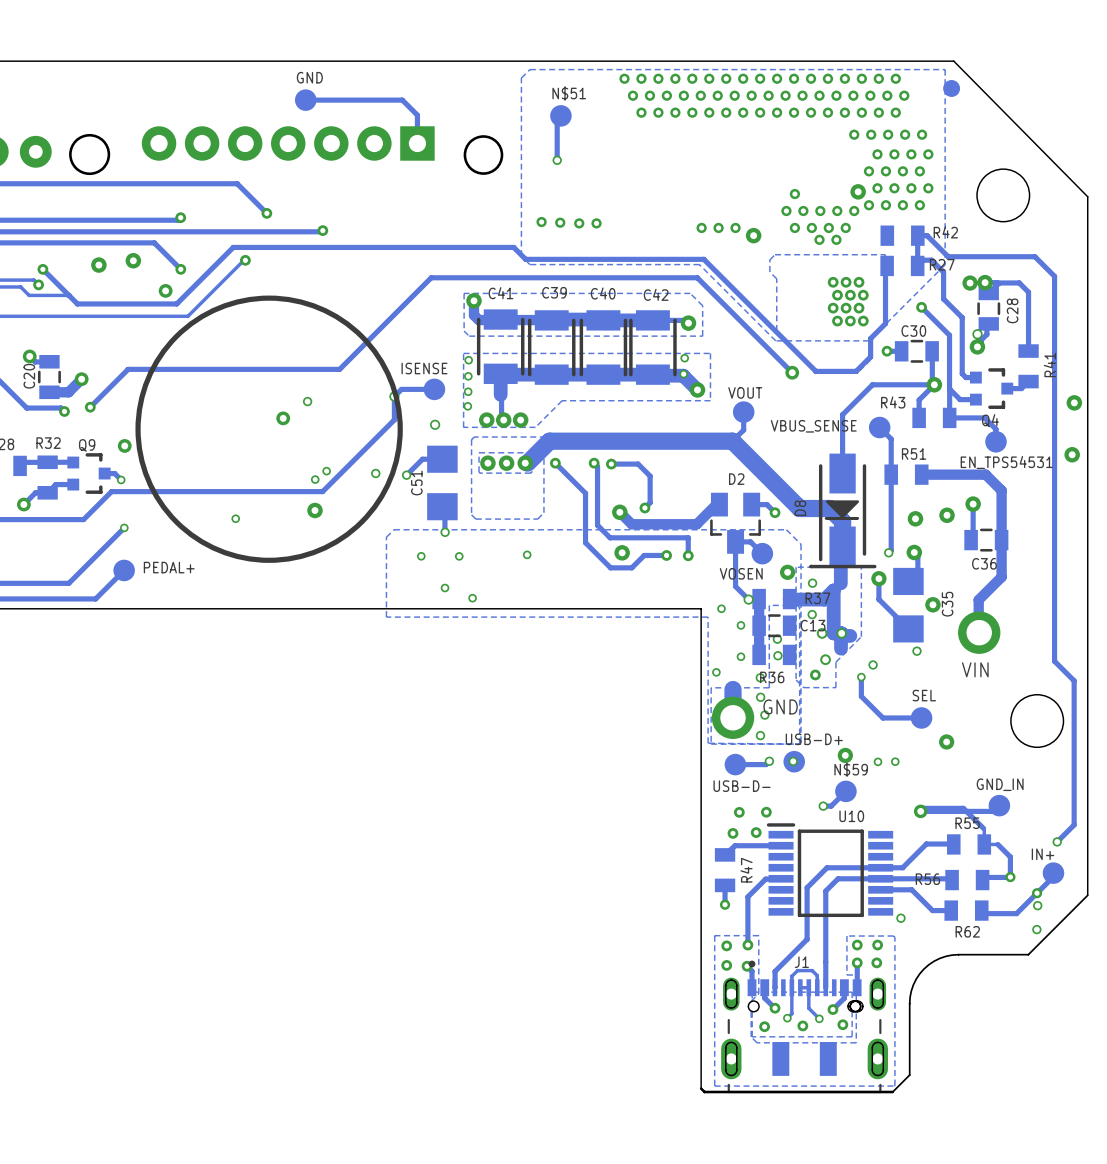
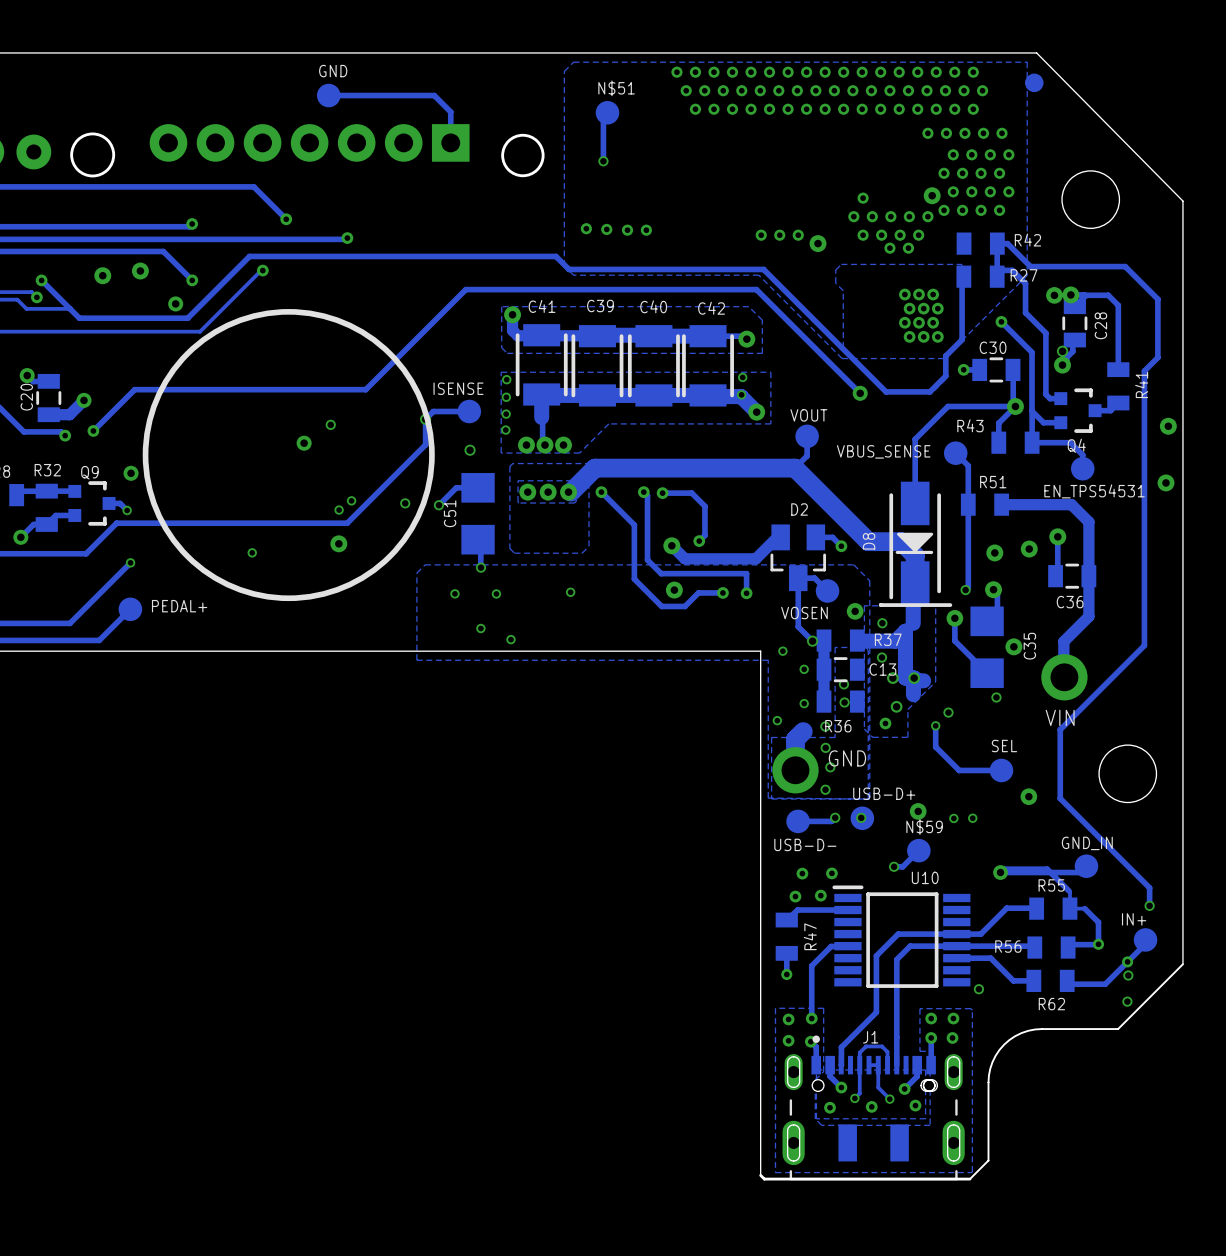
track: (1054, 276) (1054, 661) (1074, 680) (1074, 824) (1057, 841) -> (1146, 288) (1157, 299) (1157, 357) (1144, 371) (1144, 645) (1060, 729) (1060, 798) (1149, 887) (1149, 905)
track: none -> (803, 731) (795, 739)

